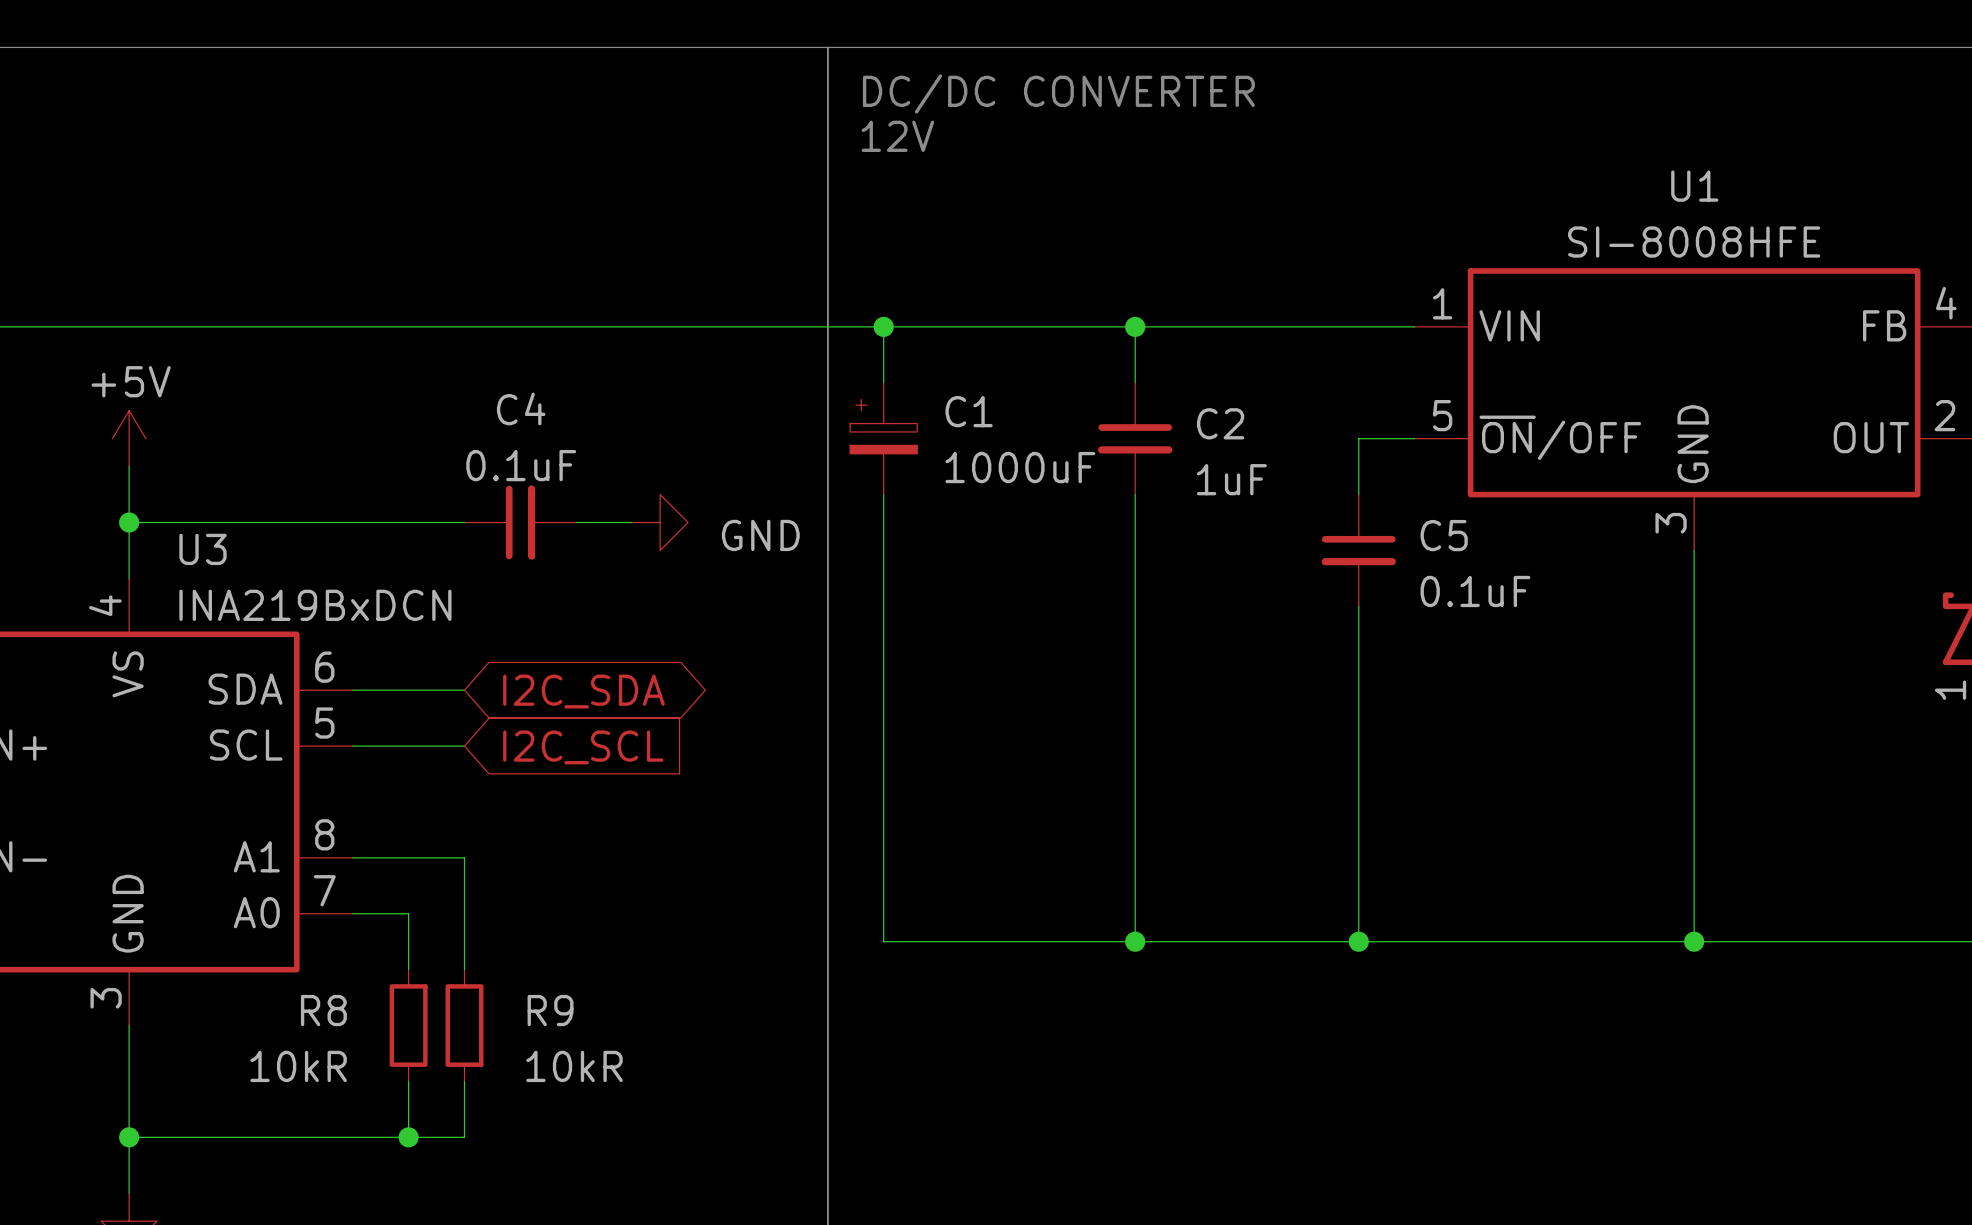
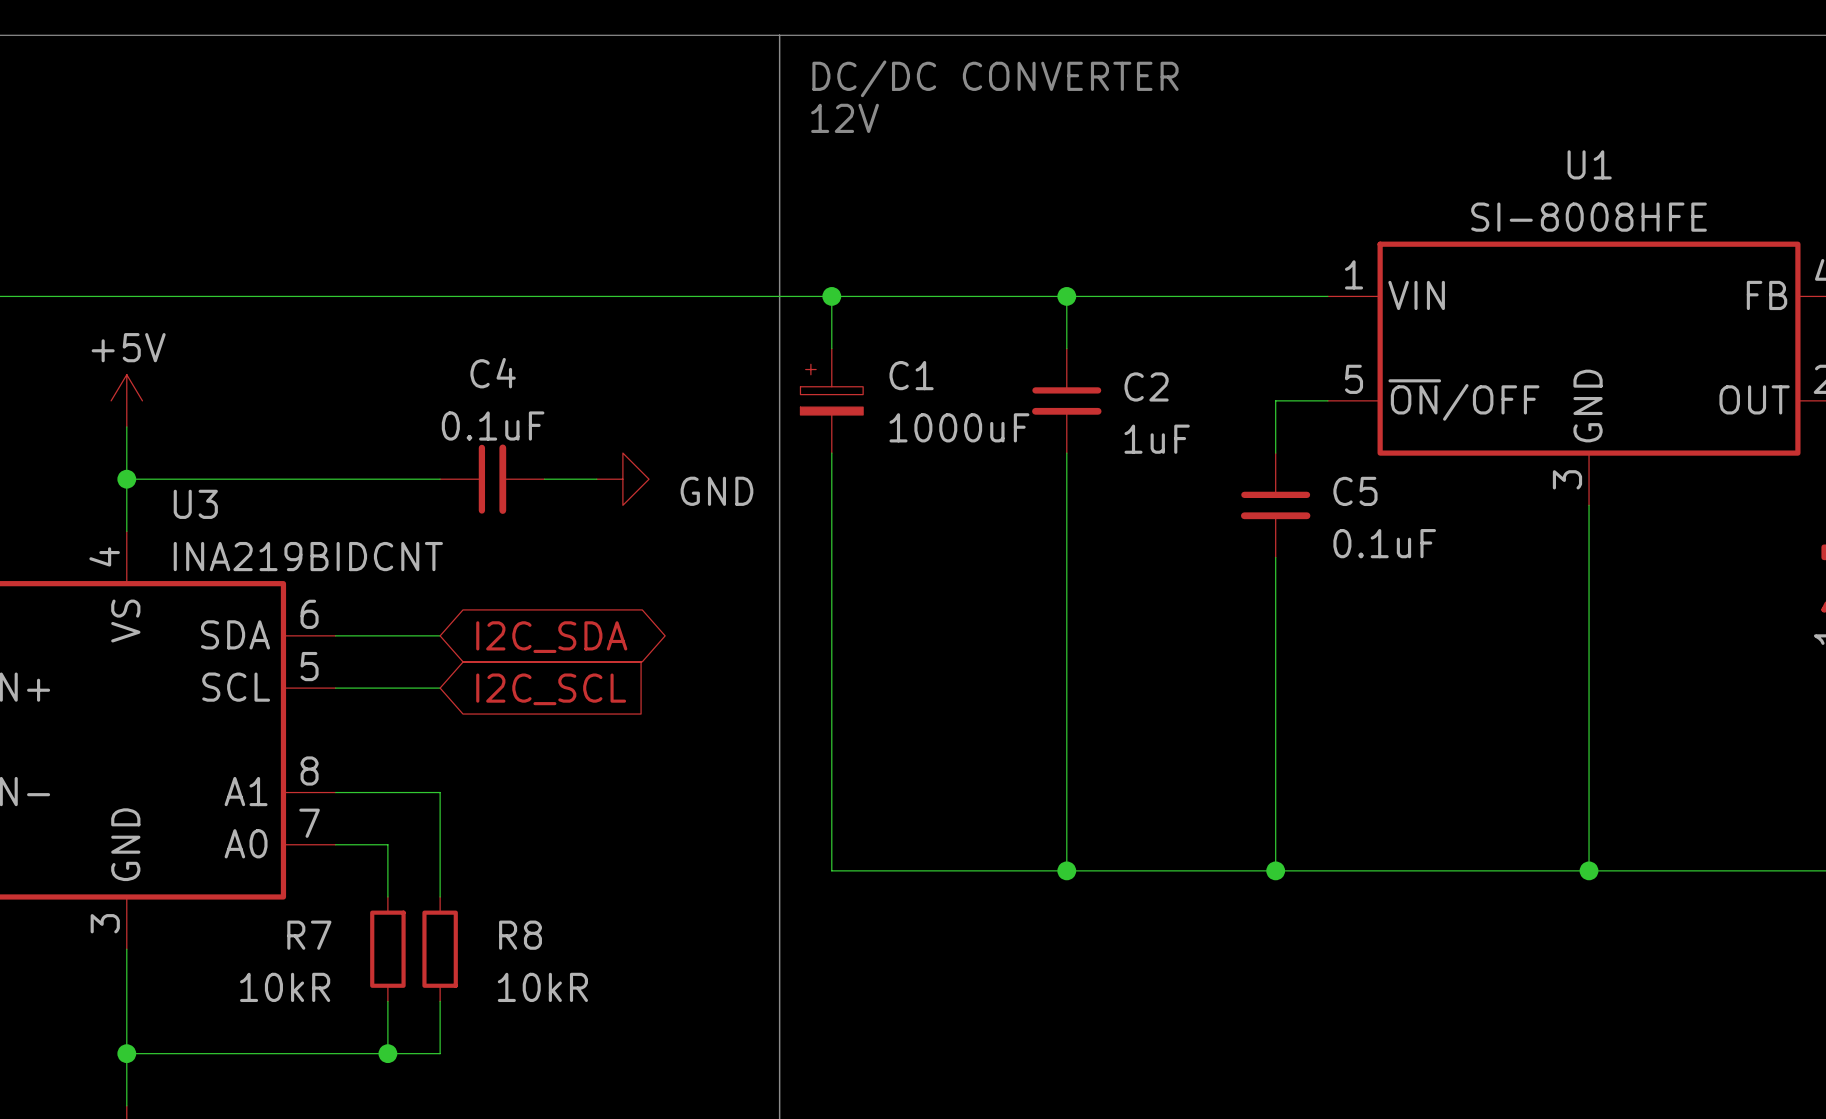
U3 value: INA219BxDCN (315, 605) -> INA219BIDCNT (308, 556)
R8 name: R8 (323, 1010) -> R7 (309, 935)
R9 name: R9 (550, 1010) -> R8 (520, 935)

